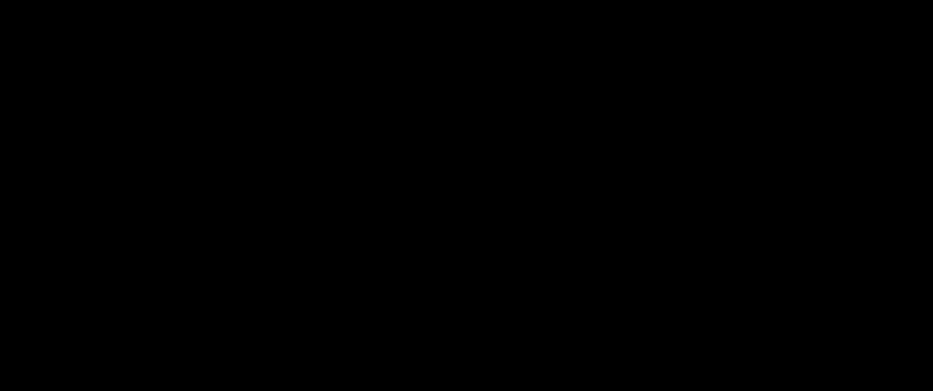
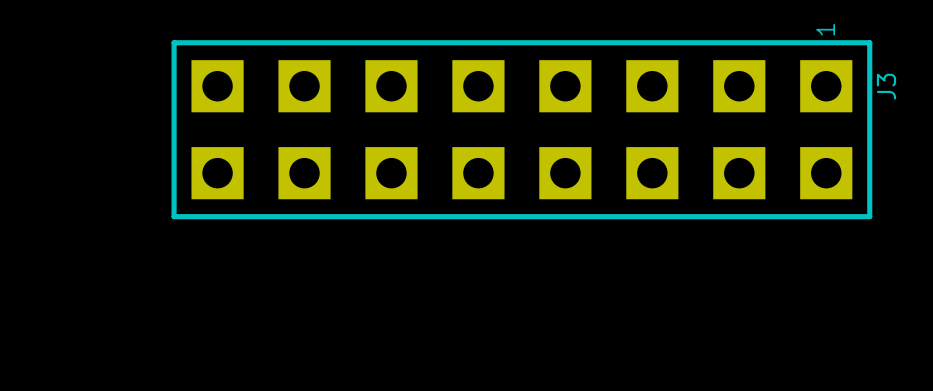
J3: none -> (521, 129)

